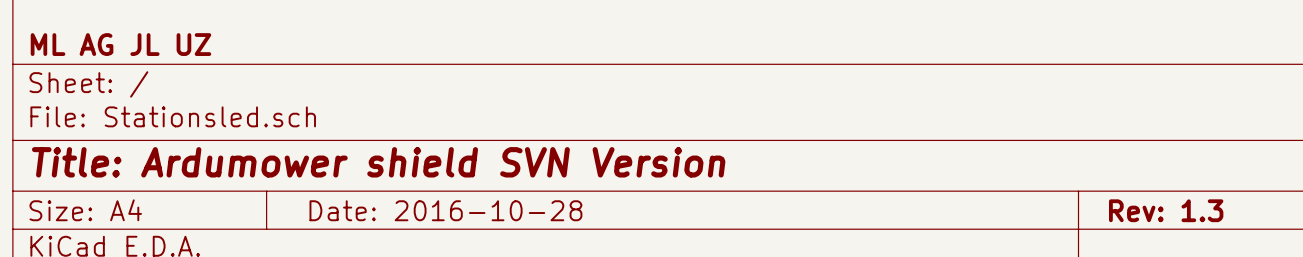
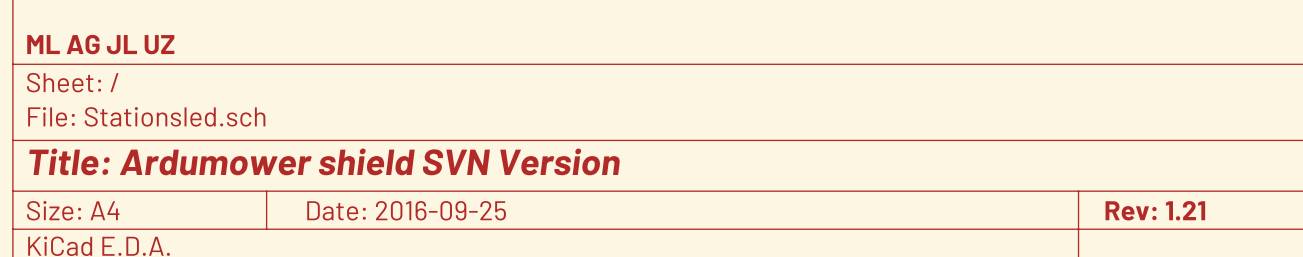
title block: Date: 2016-10-28 (445, 210) -> Date: 2016-09-25 (406, 210)
title block: Rev: 1.3 (1166, 210) -> Rev: 1.21 (1155, 210)

